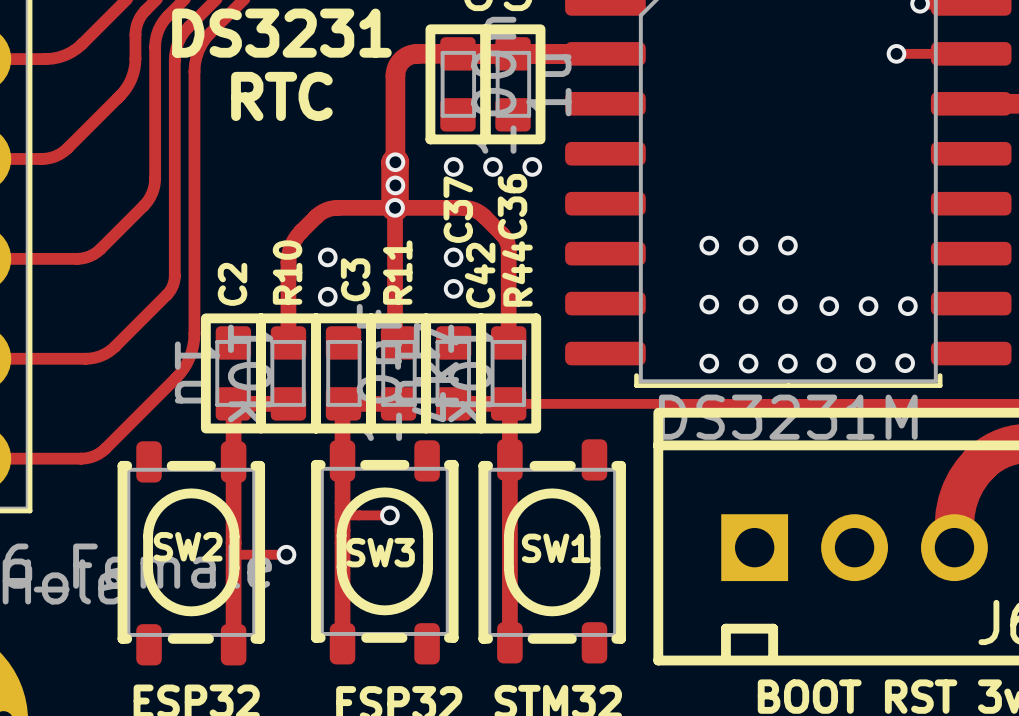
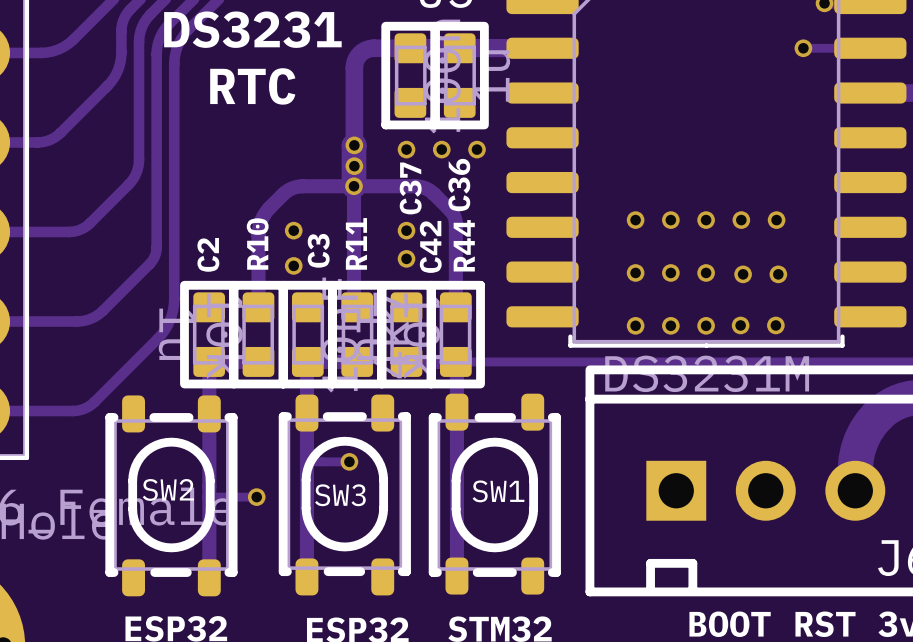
via: none -> (741, 220)
via: none -> (776, 220)
via: (907, 306) -> none
via: (905, 363) -> none

